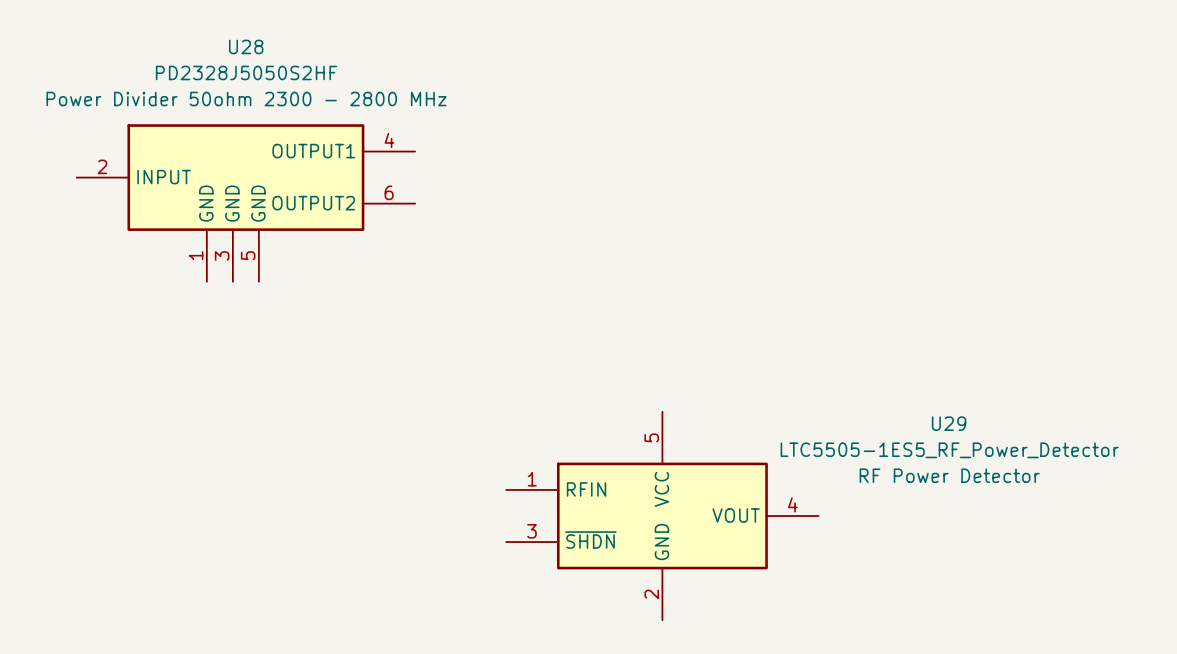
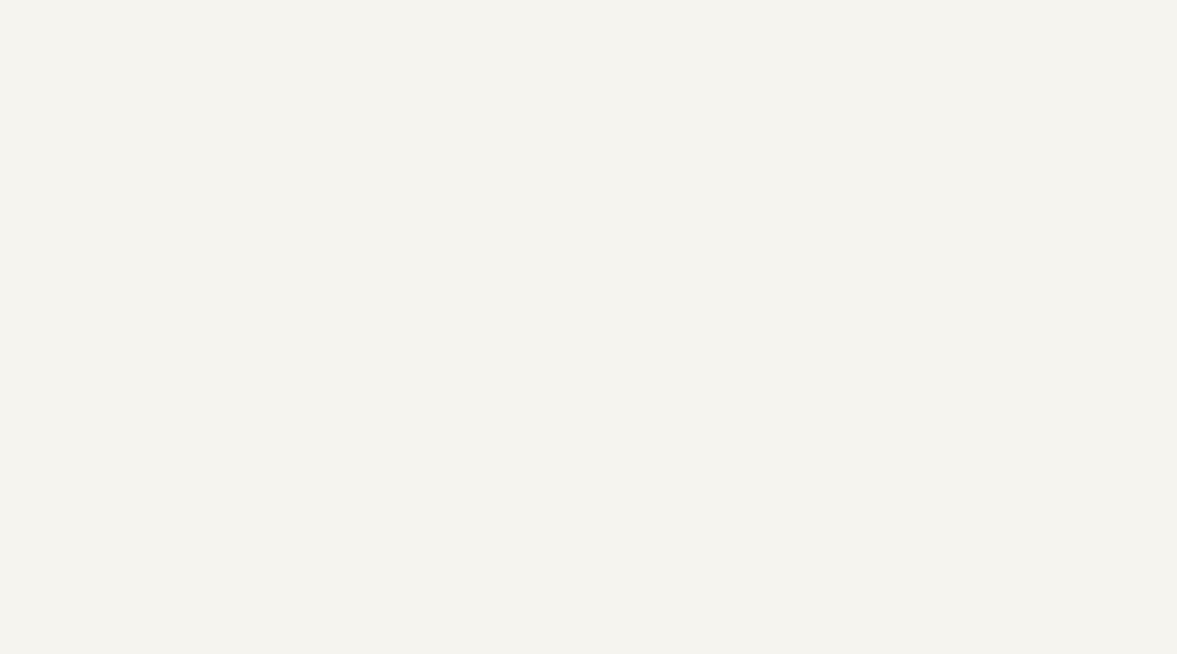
U28: PD2328J5050S2HF (245, 202) -> none
U29: LTC5505-1ES5_RF_Power_Detector (662, 515) -> none

